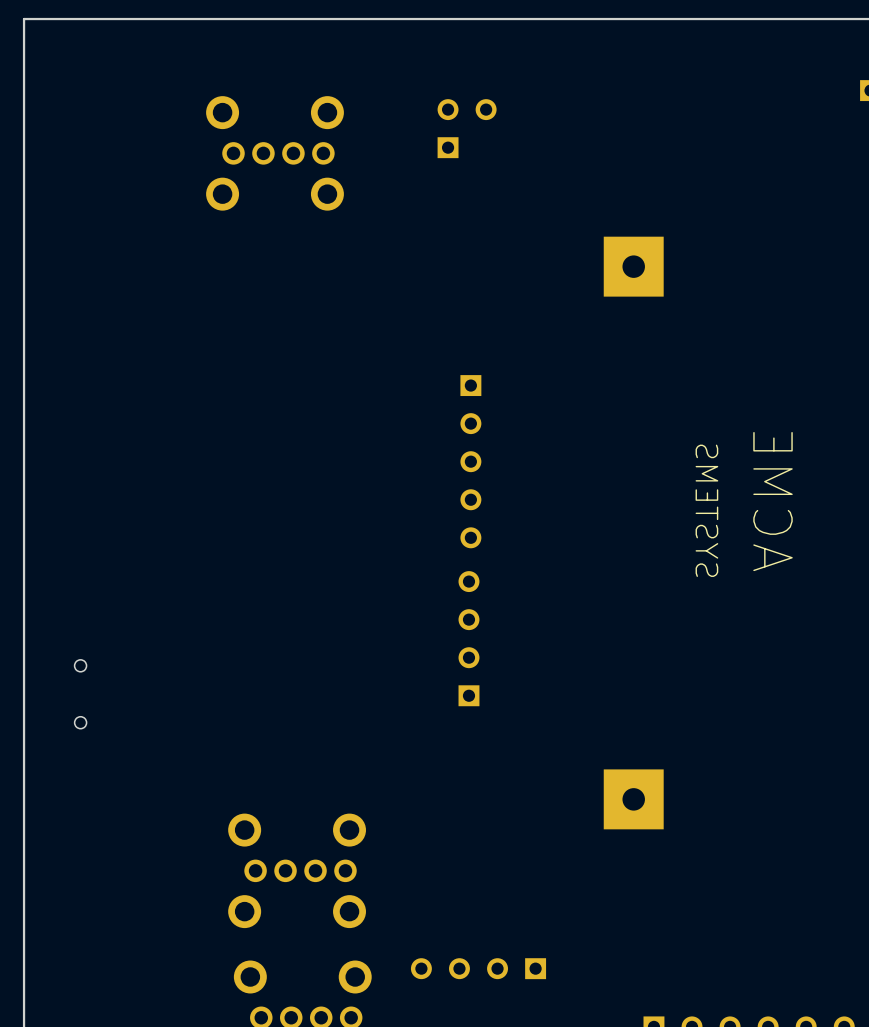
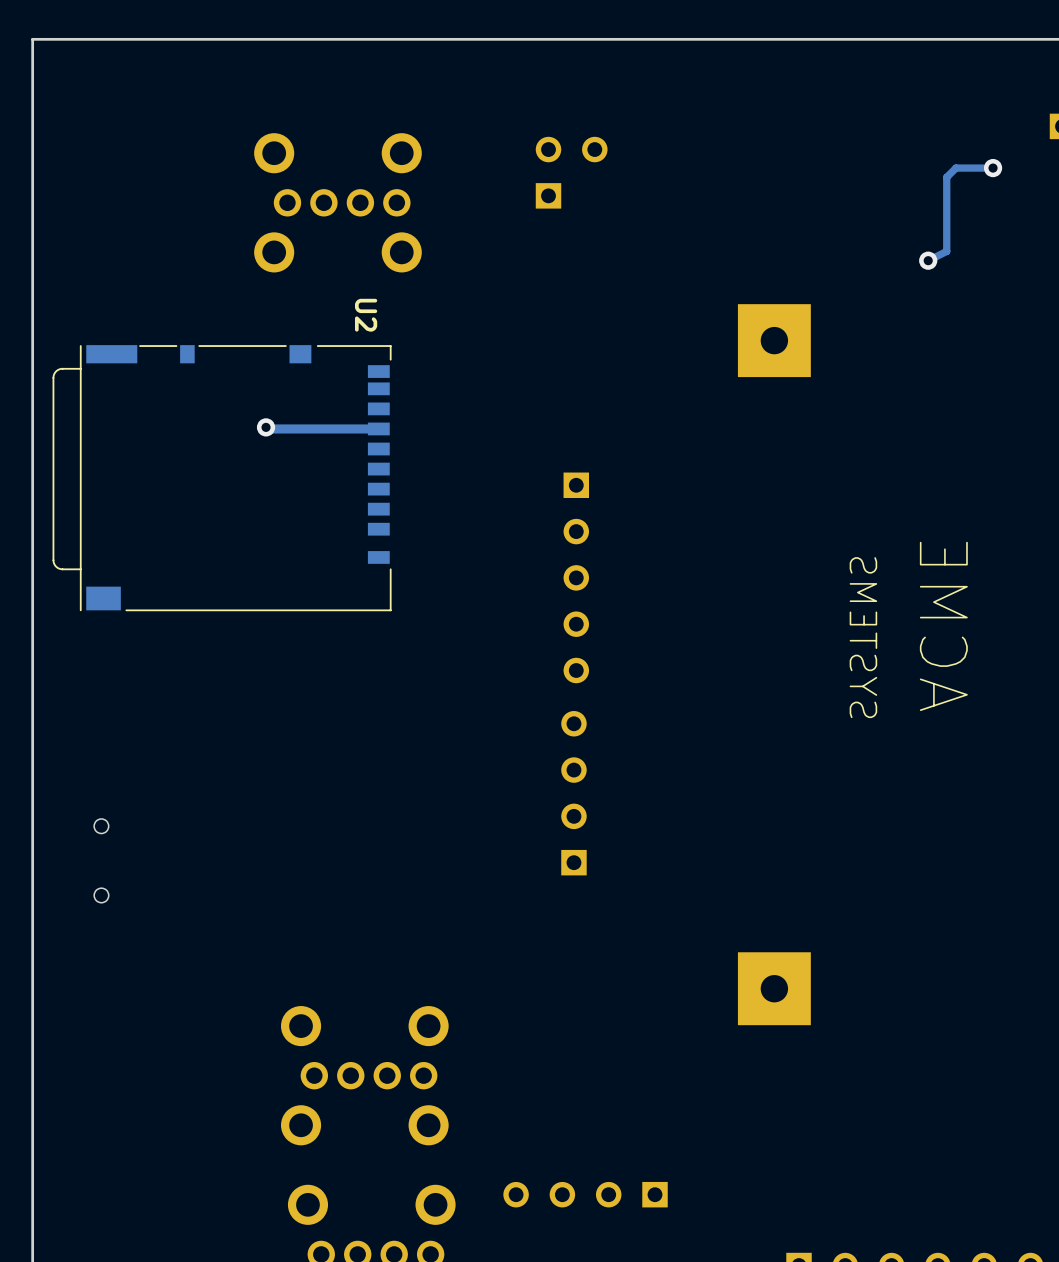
track: none -> (993, 168) (956, 168) (946, 177) (946, 251) (928, 260)
via: none -> (993, 168)
via: none -> (928, 260)
track: none -> (266, 427) (267, 428) (378, 428)
via: none -> (266, 427)
U2: none -> (222, 478)

